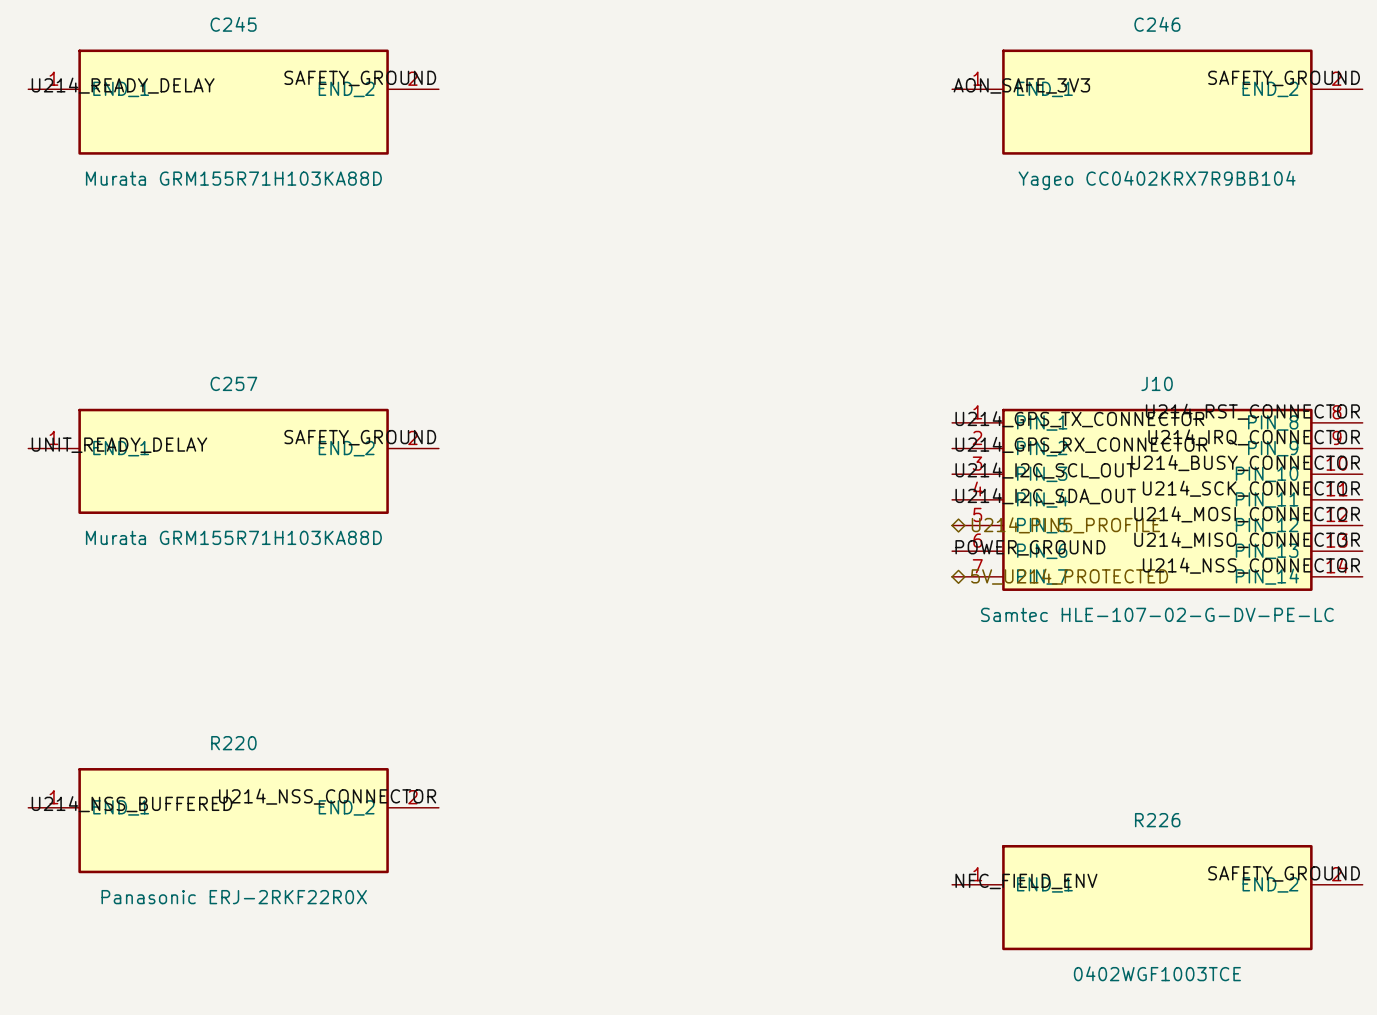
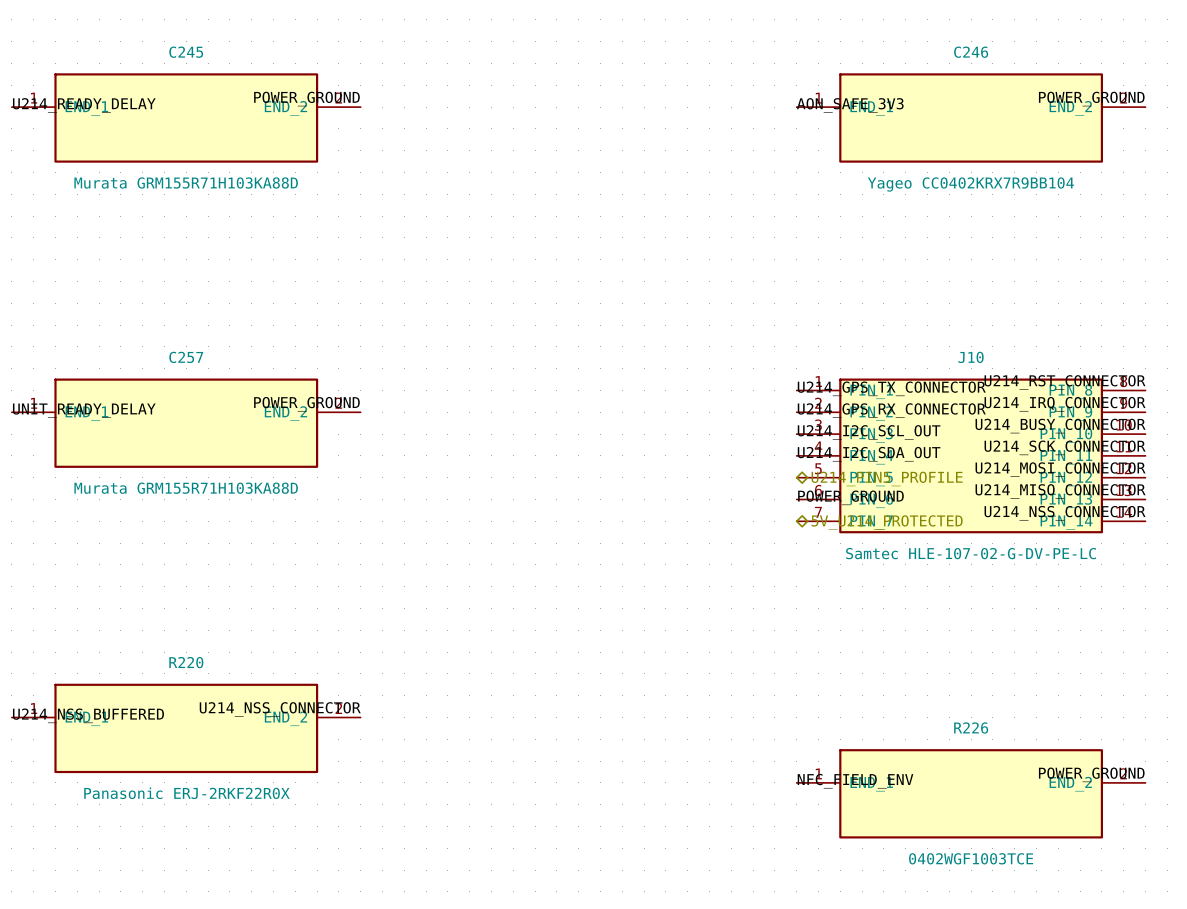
label: SAFETY_GROUND (360, 78) -> POWER_GROUND (306, 99)
label: SAFETY_GROUND (1284, 78) -> POWER_GROUND (1091, 99)
label: SAFETY_GROUND (360, 437) -> POWER_GROUND (306, 404)
label: SAFETY_GROUND (1284, 873) -> POWER_GROUND (1091, 774)

